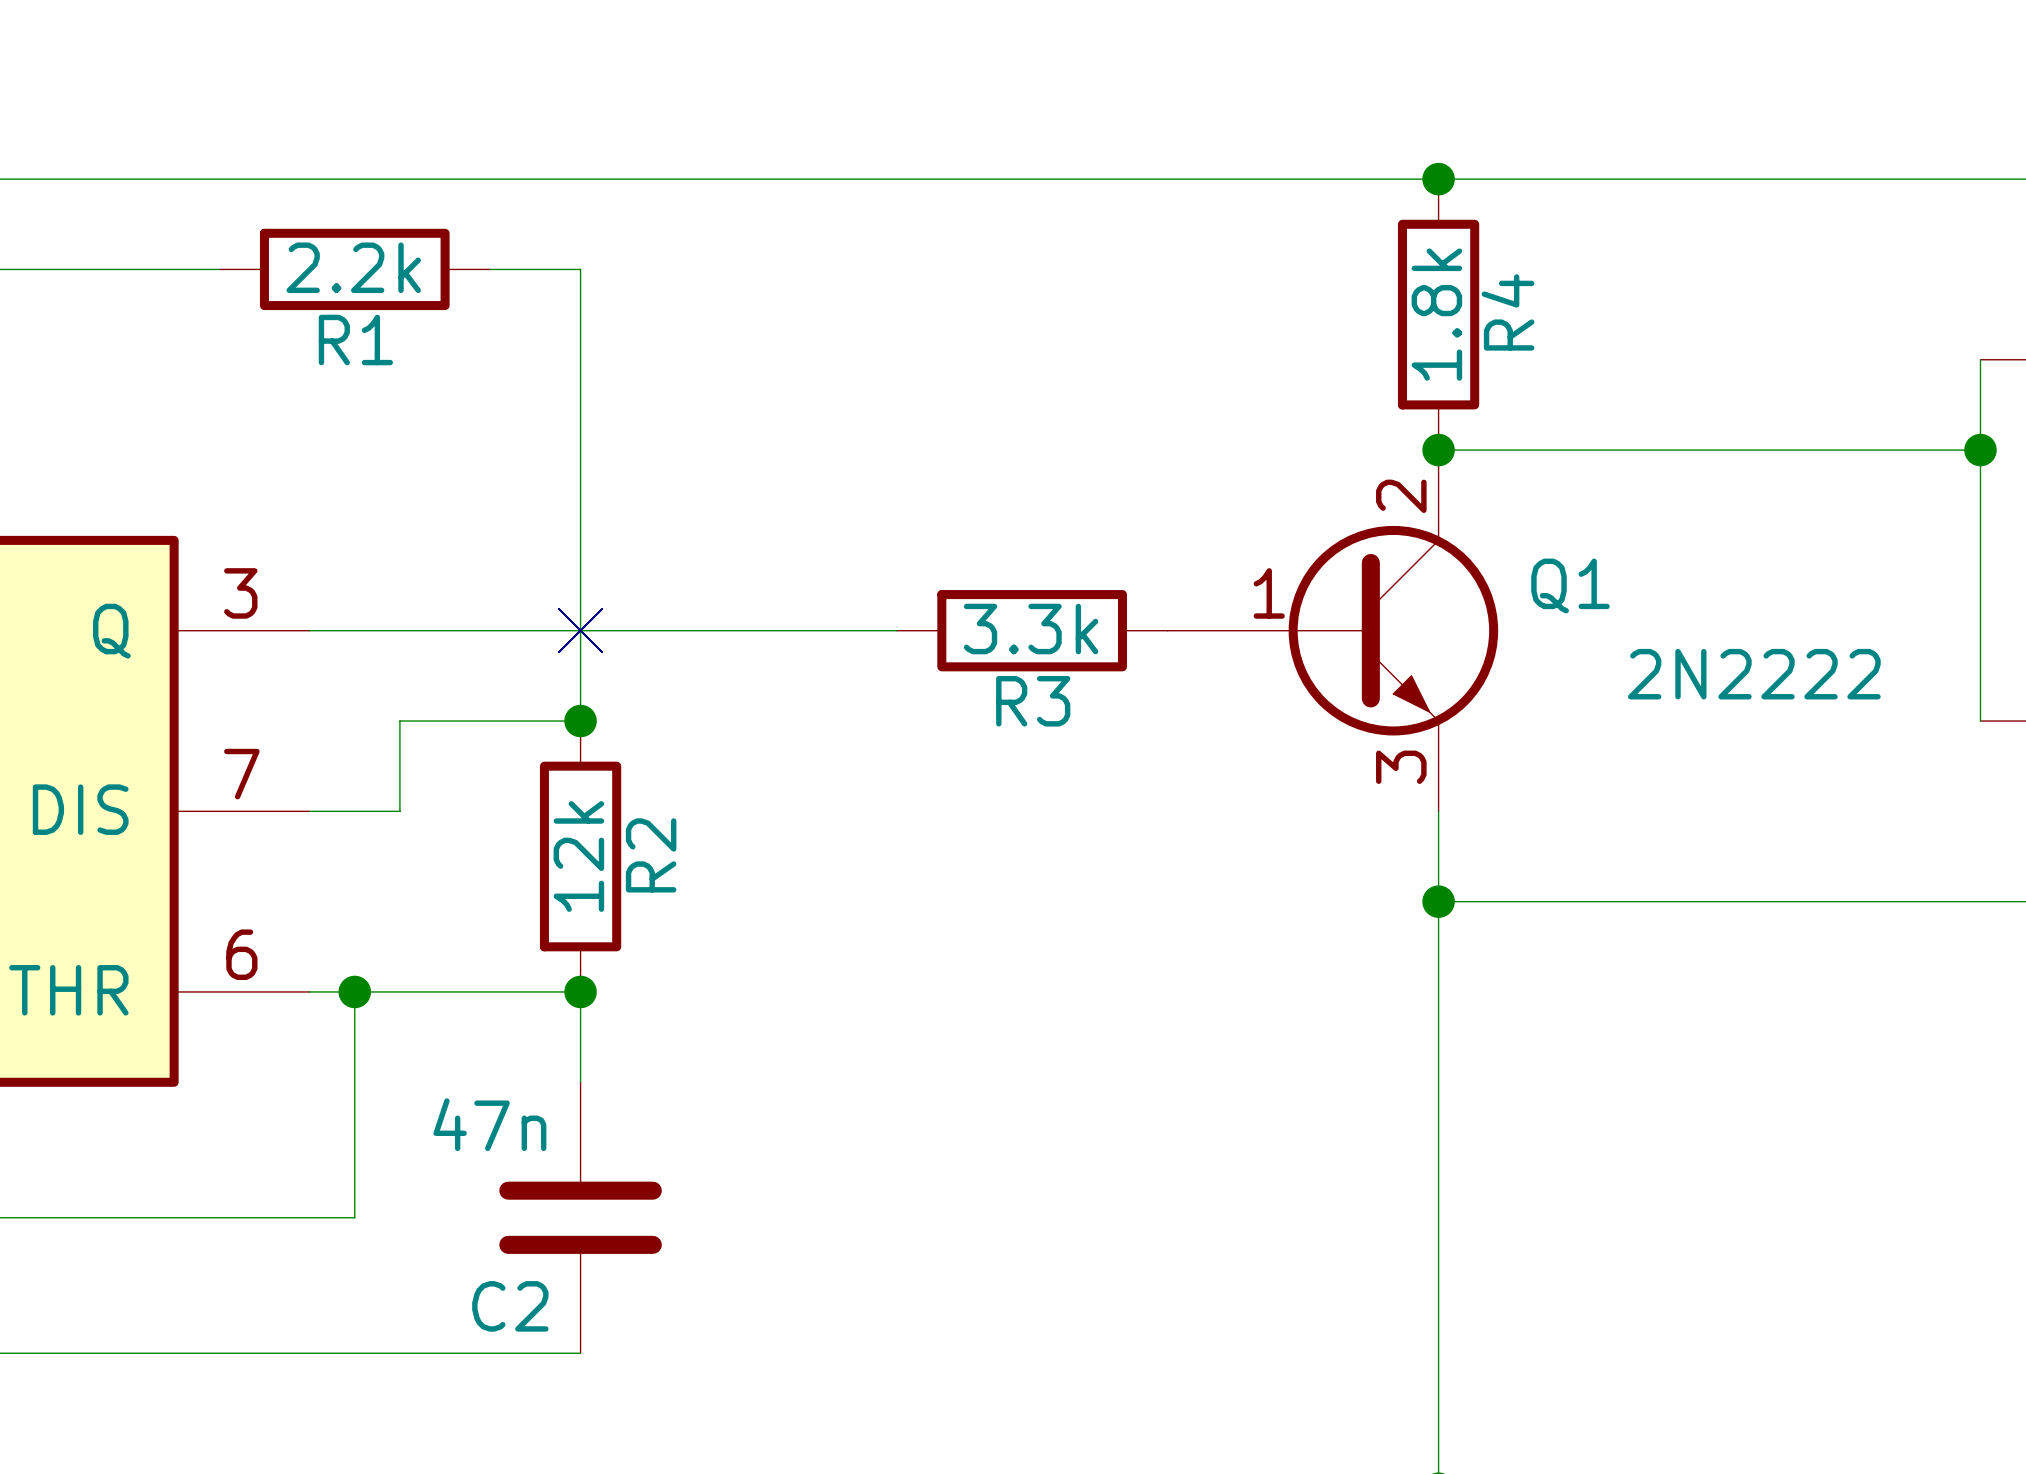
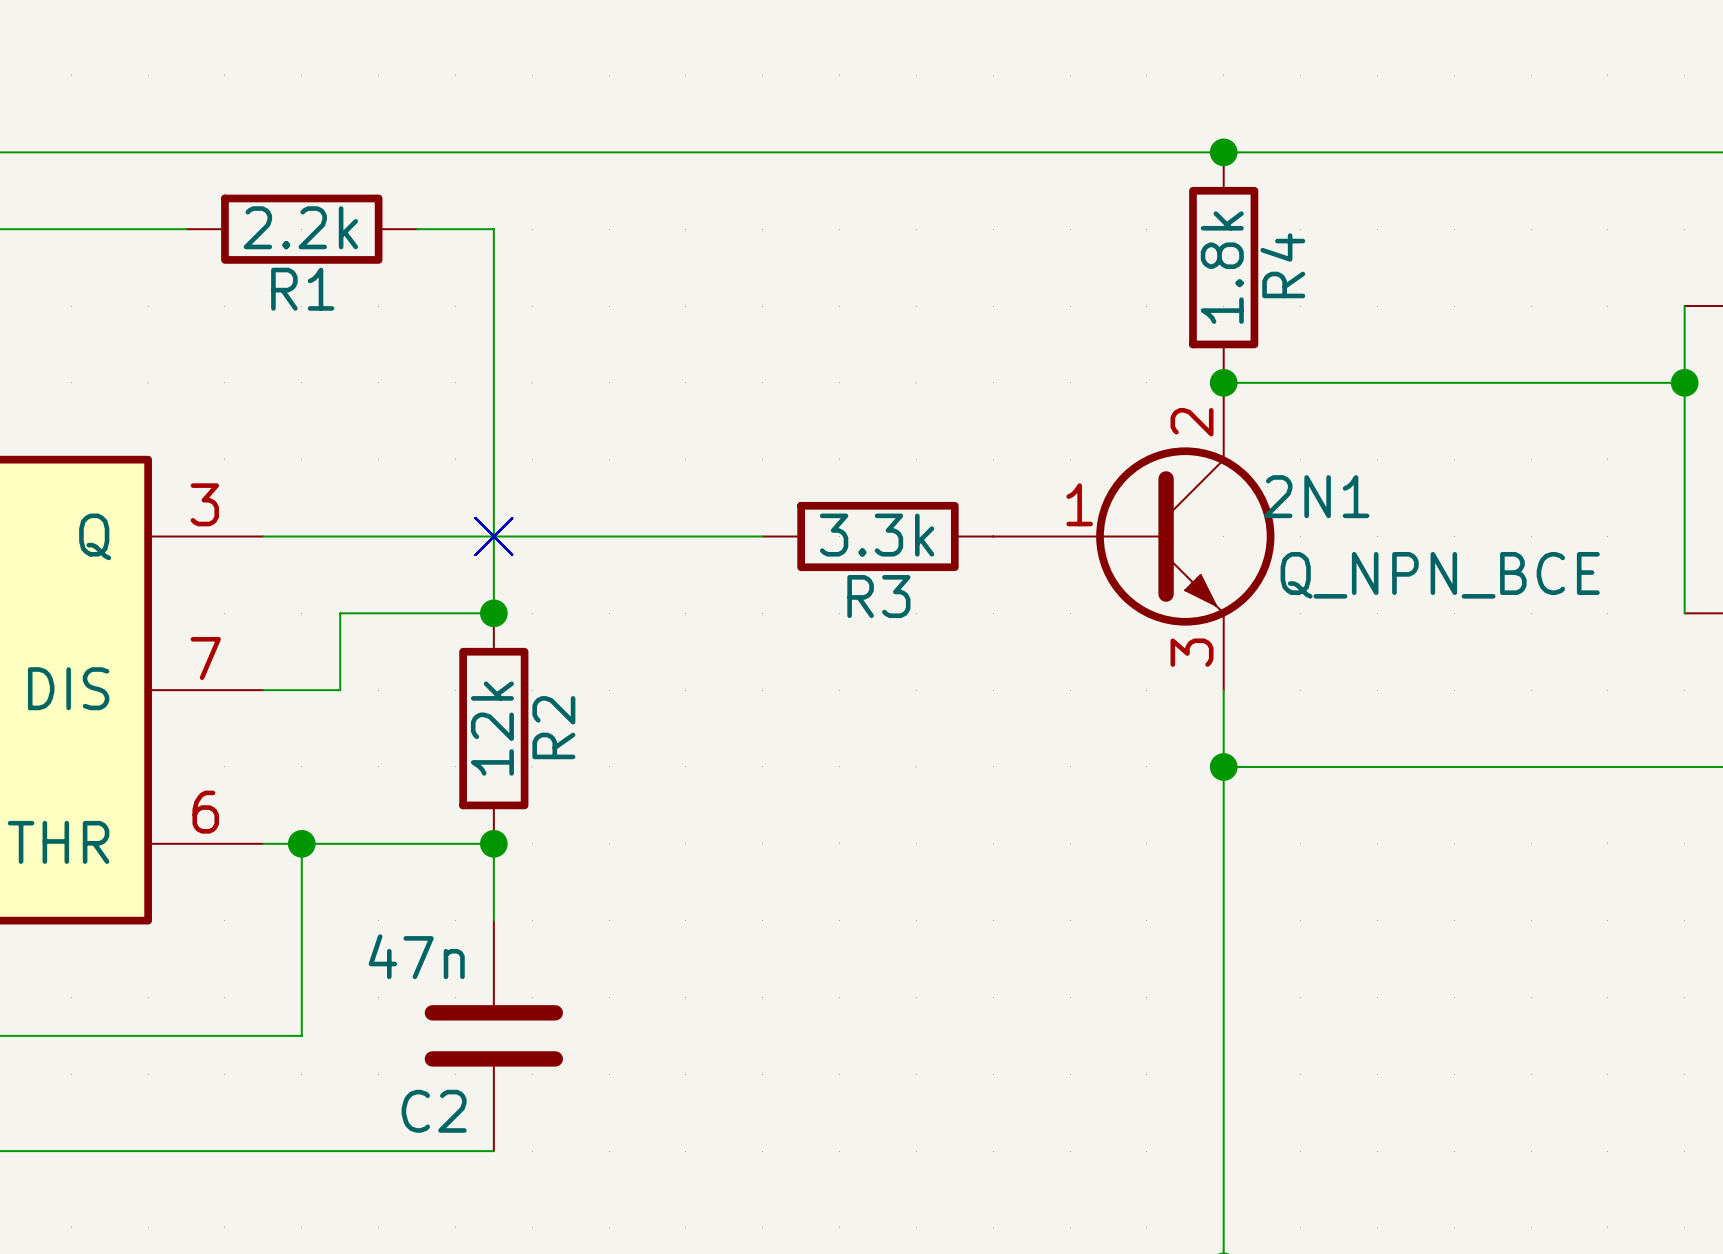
Q1 name: Q1 (1570, 586) -> 2N1 (1316, 496)
Q1 value: 2N2222 (1754, 674) -> Q_NPN_BCE (1440, 575)

